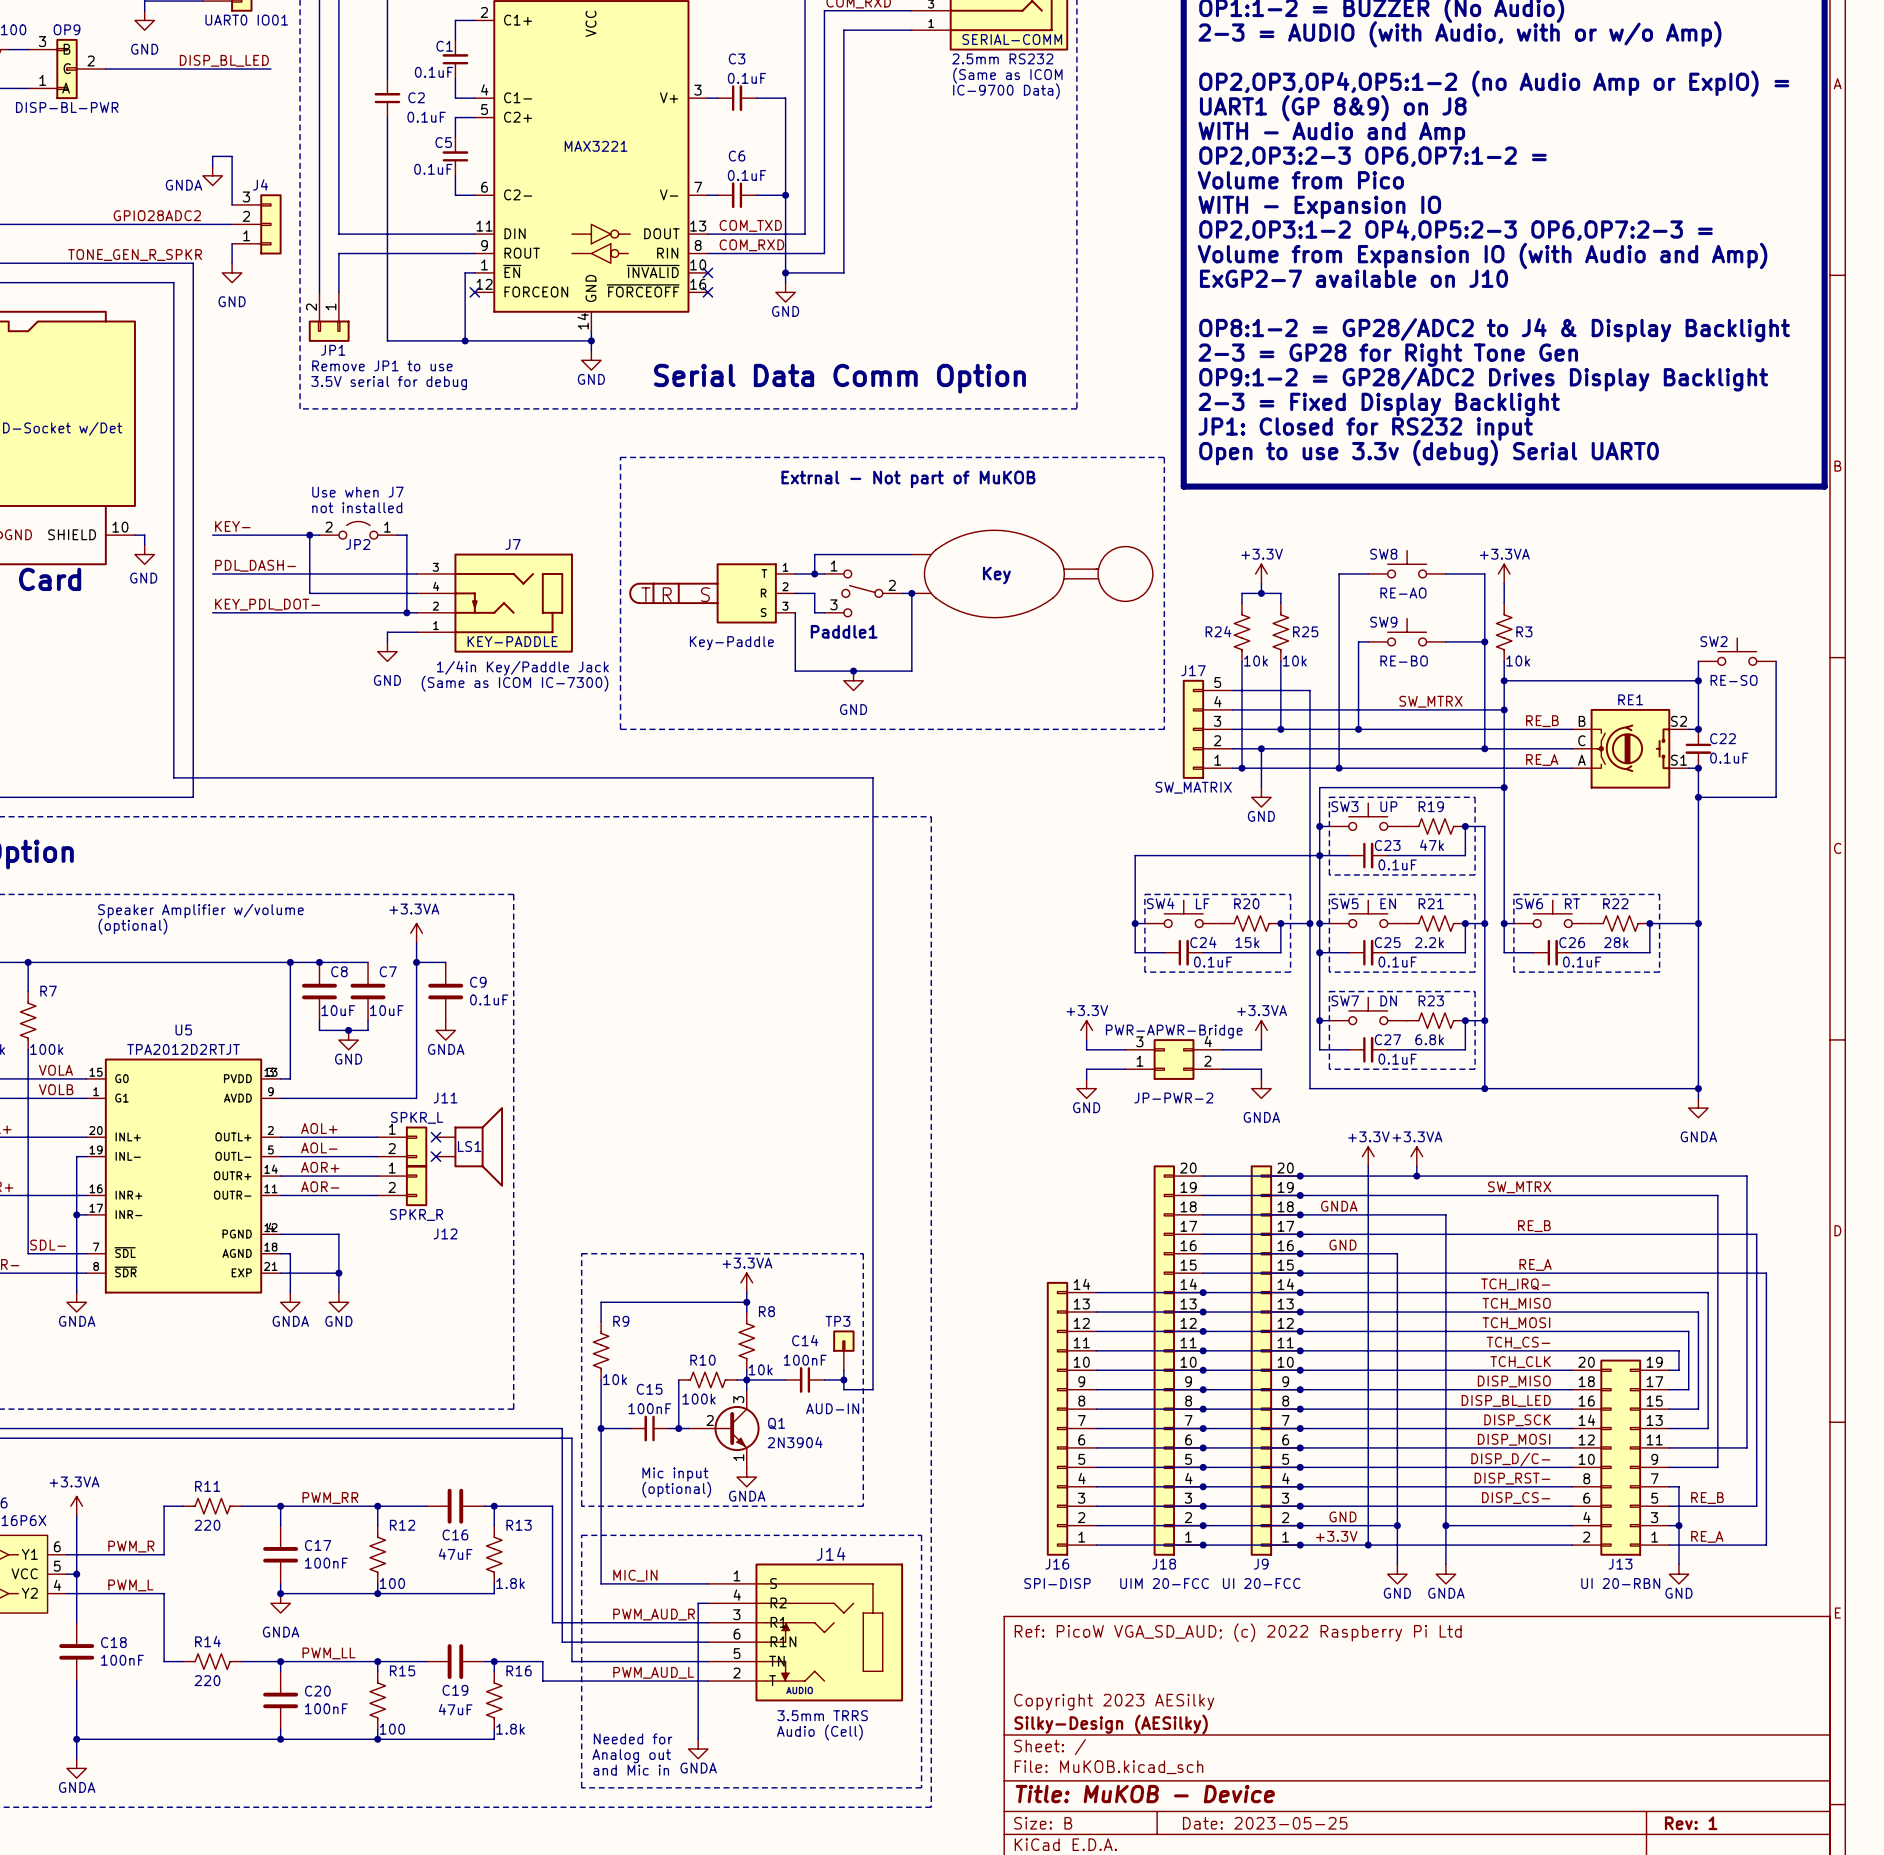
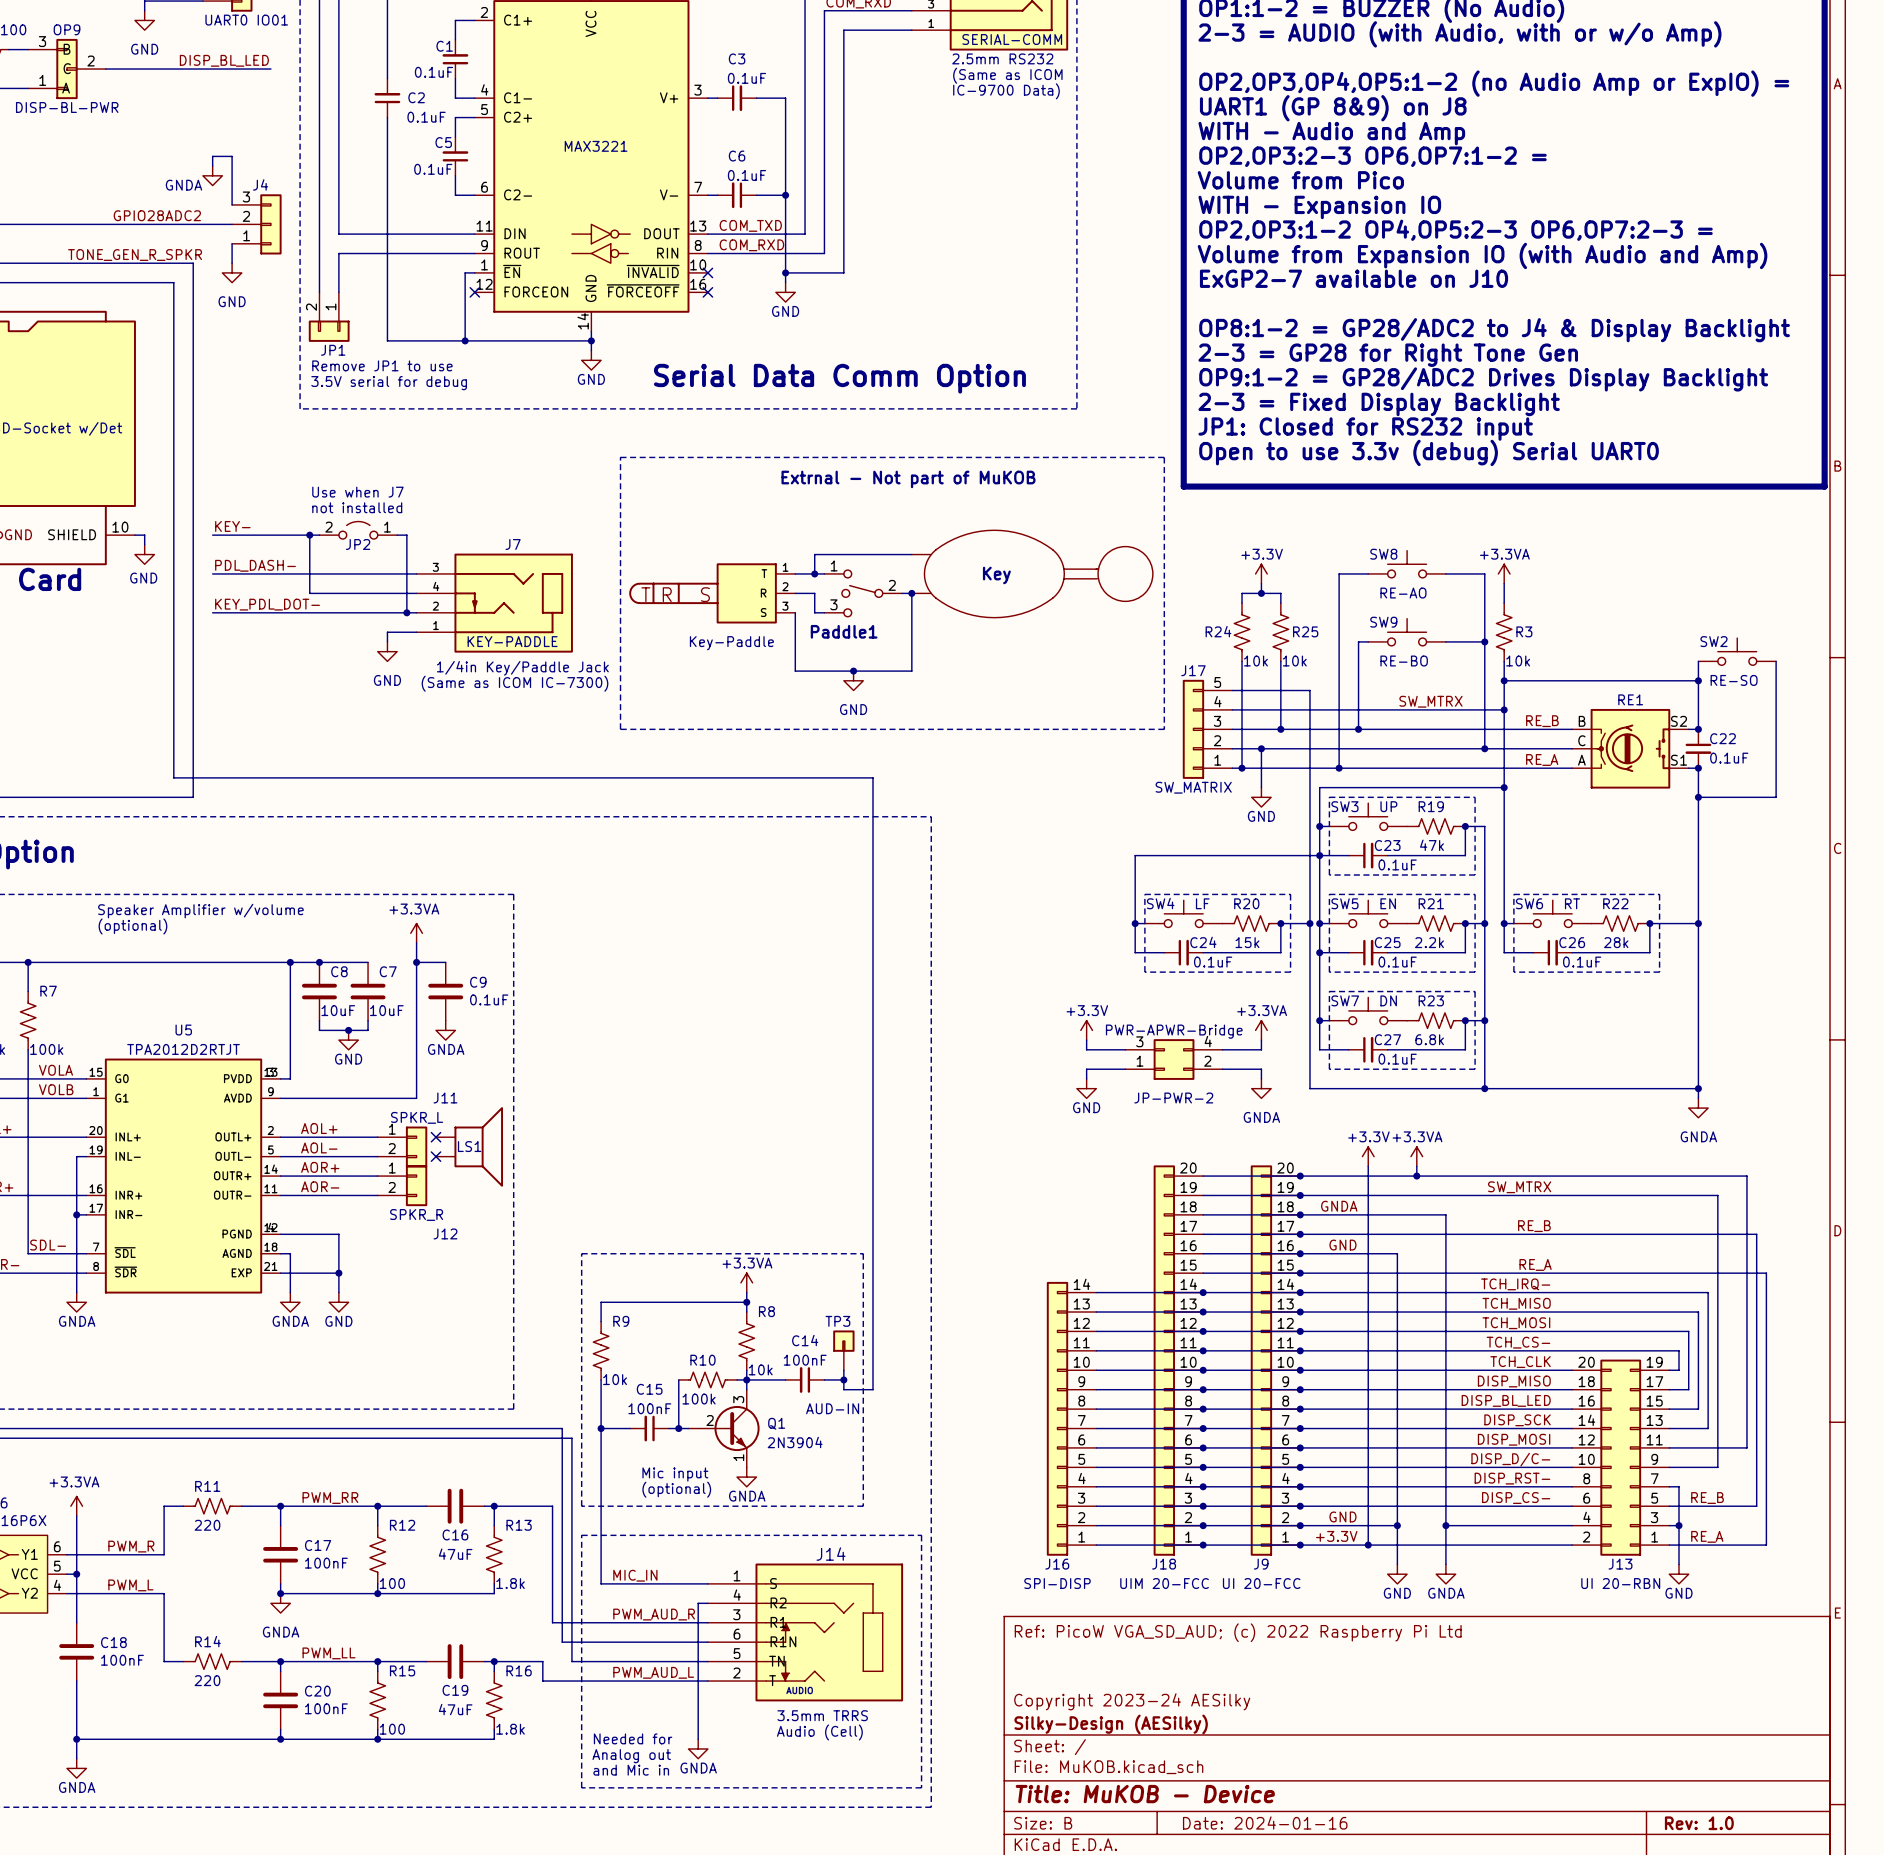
title block: Copyright 2023 AESilky (1114, 1702) -> Copyright 2023-24 AESilky (1132, 1701)
title block: Date: 2023-05-25 (1265, 1823) -> Date: 2024-01-16 (1265, 1822)
title block: Rev: 1 (1691, 1823) -> Rev: 1.0 (1699, 1823)

